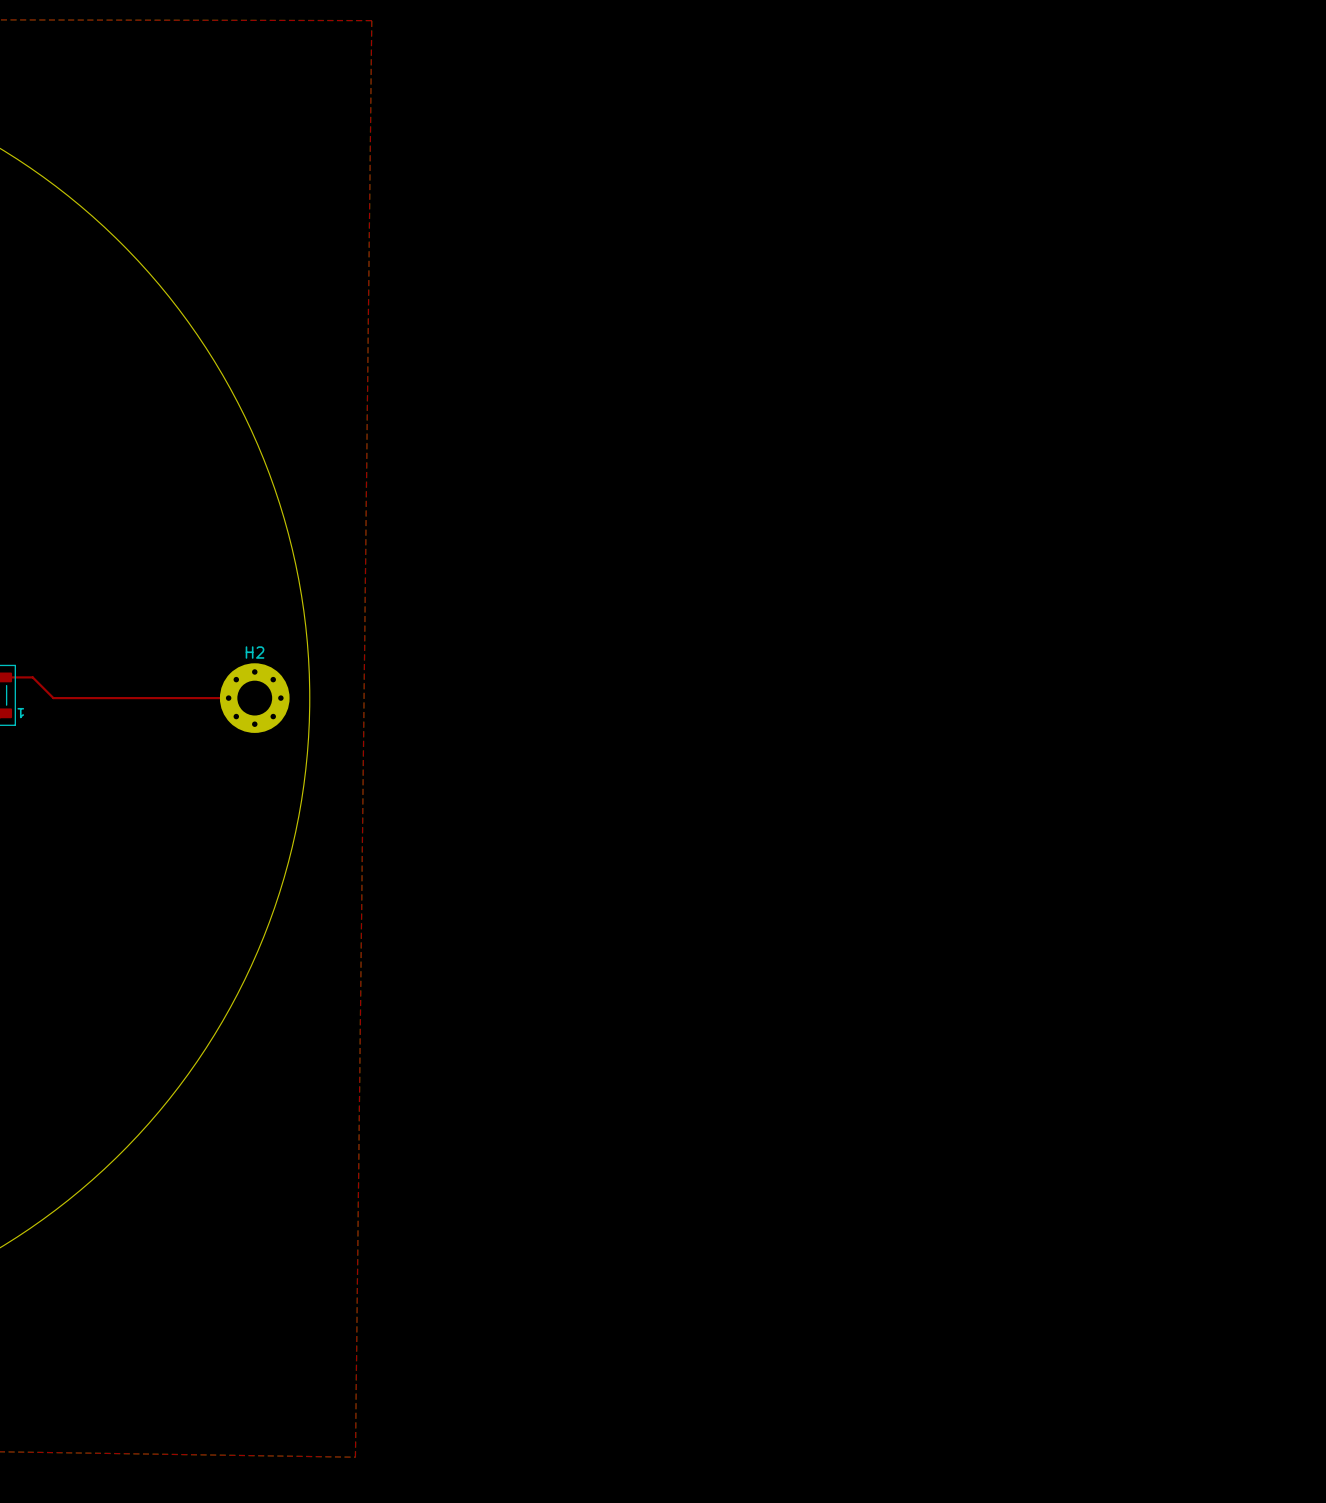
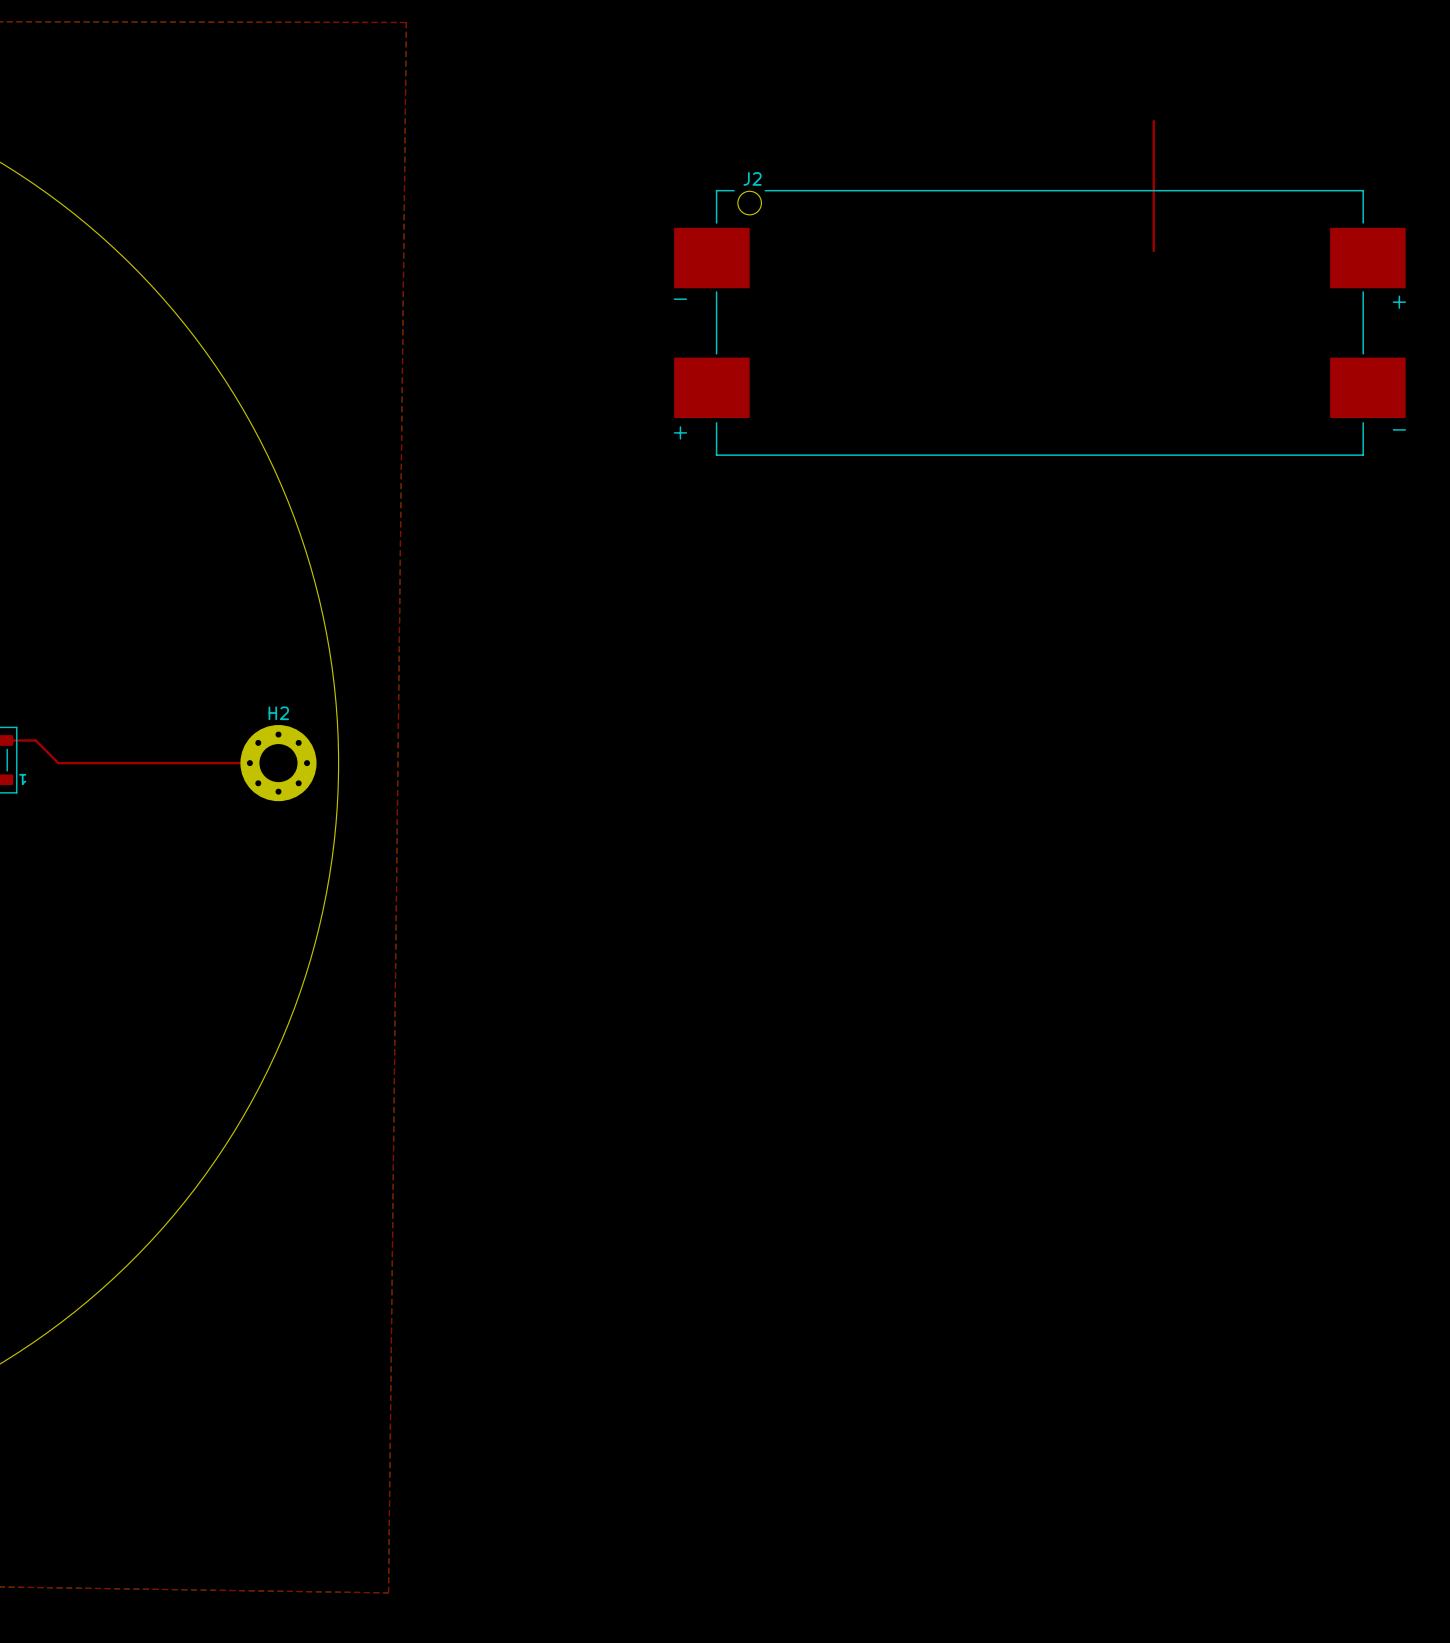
top track: none -> (1153, 121) (1153, 251)
J2: none -> (1039, 322)

